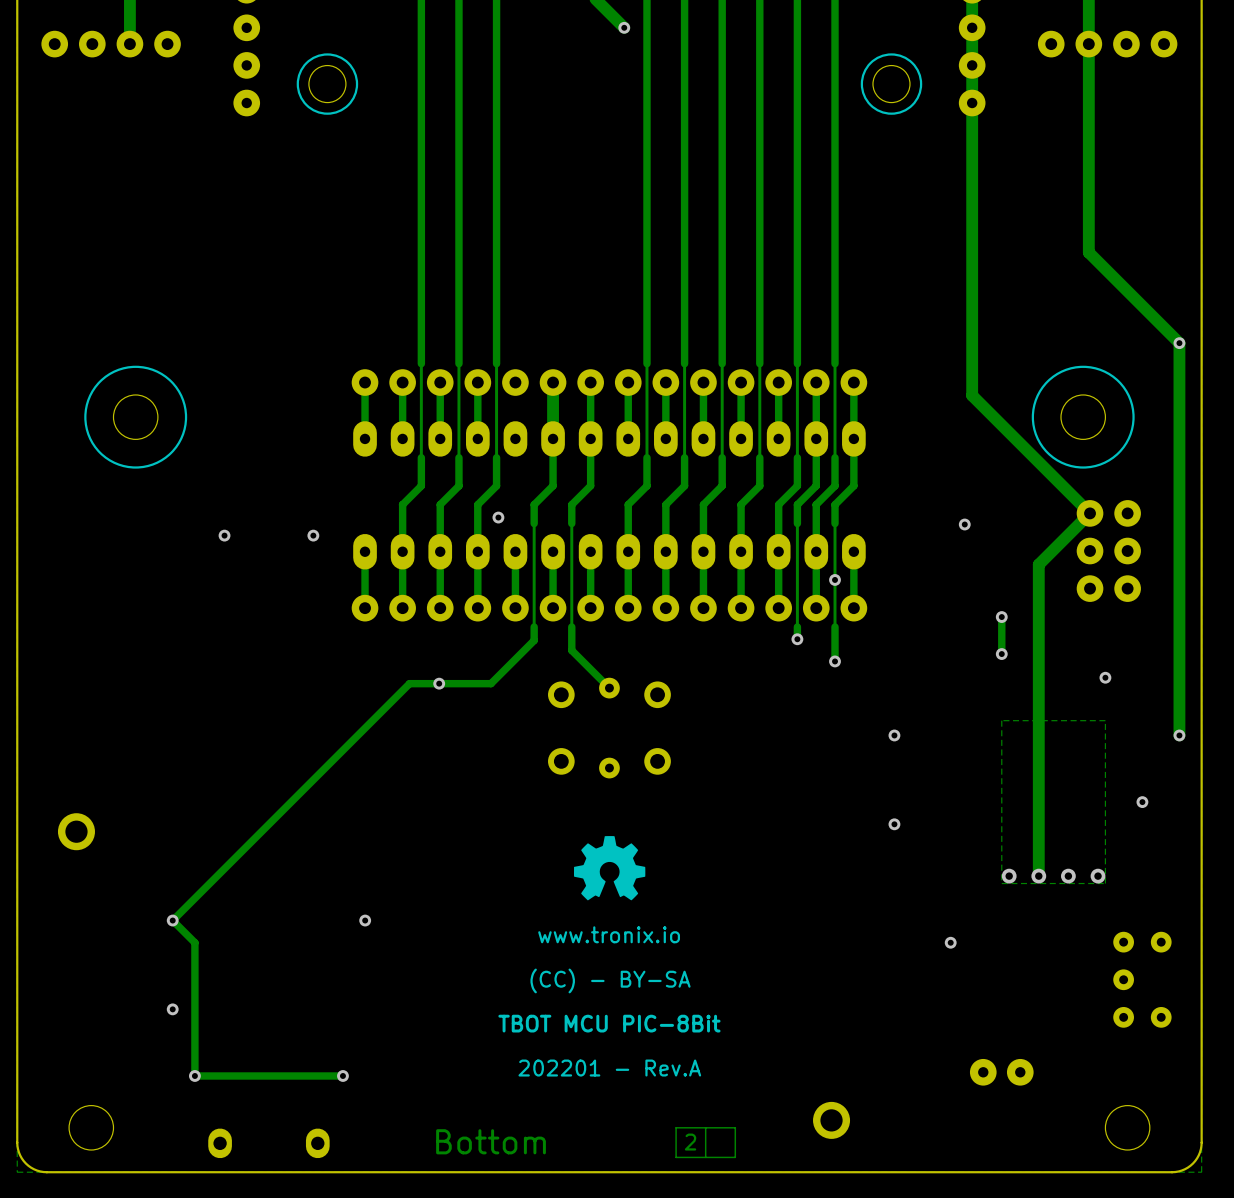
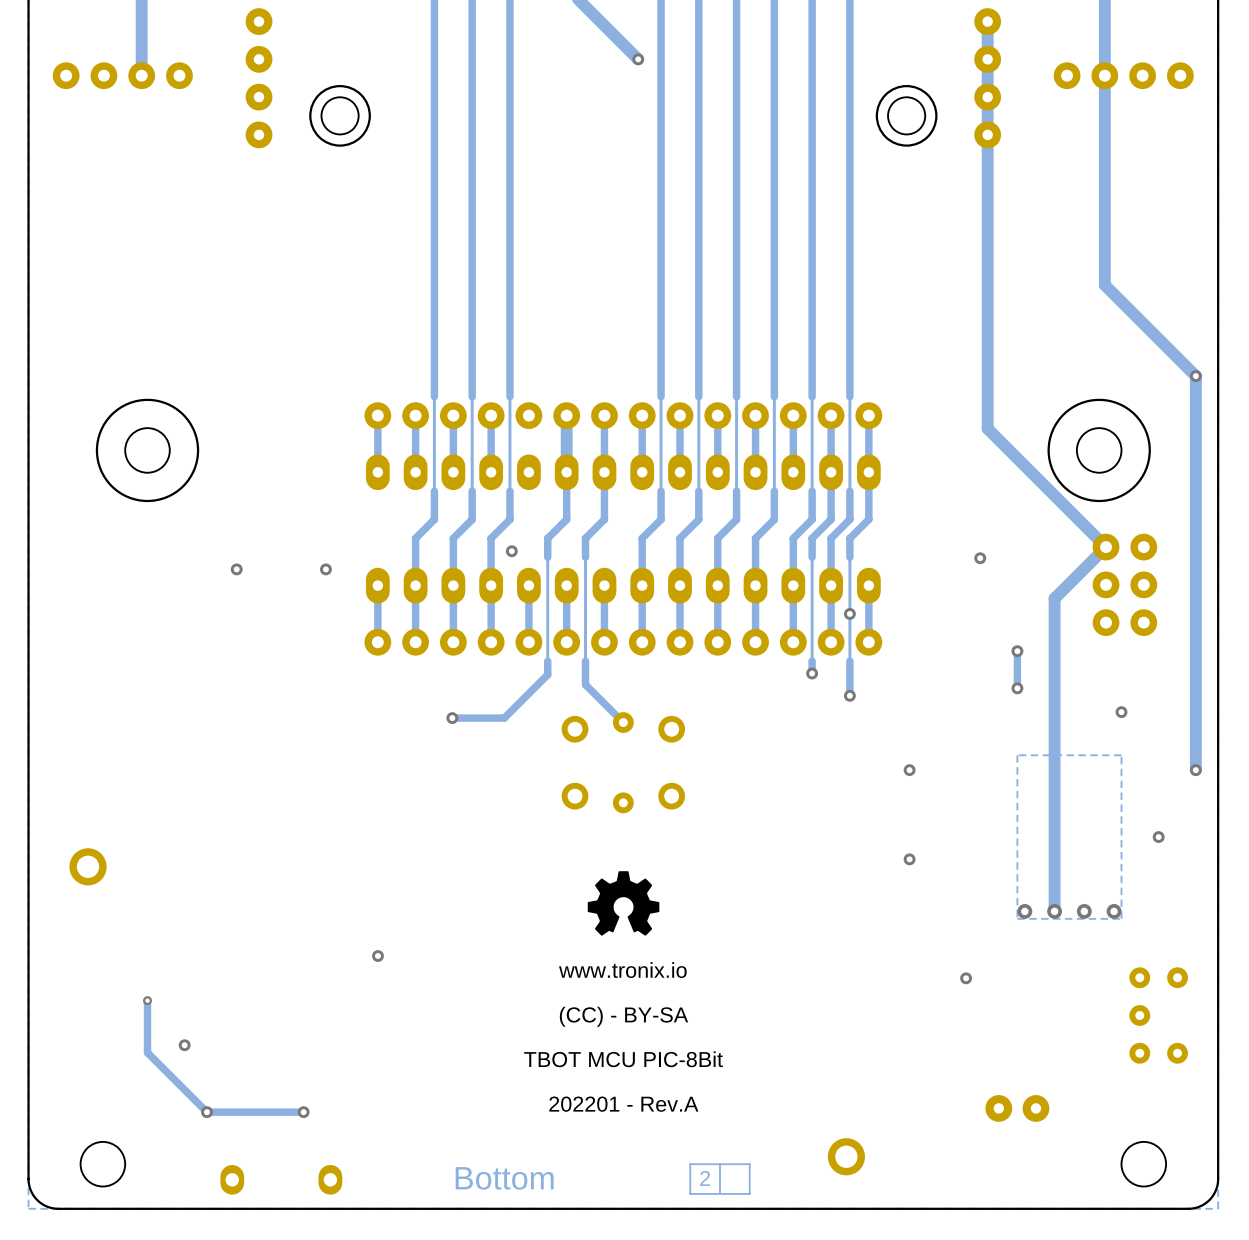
track: (439, 683) (409, 683) (172, 920) (194, 942) (194, 1075) -> (147, 1000) (147, 1052) (206, 1112)
via: (172, 920) -> none
via: none -> (147, 1000)
track: (342, 1075) (291, 1075) -> none
via position: (342, 1075) -> (303, 1112)

